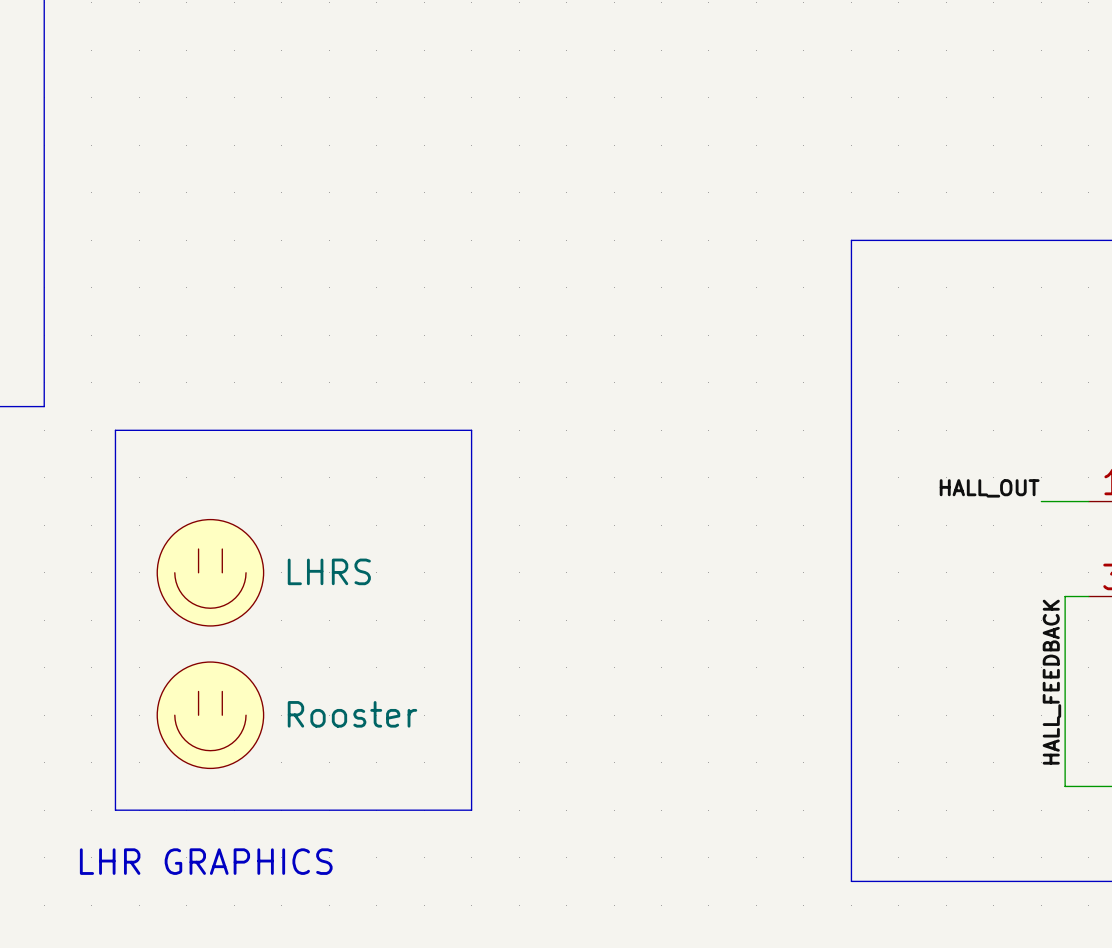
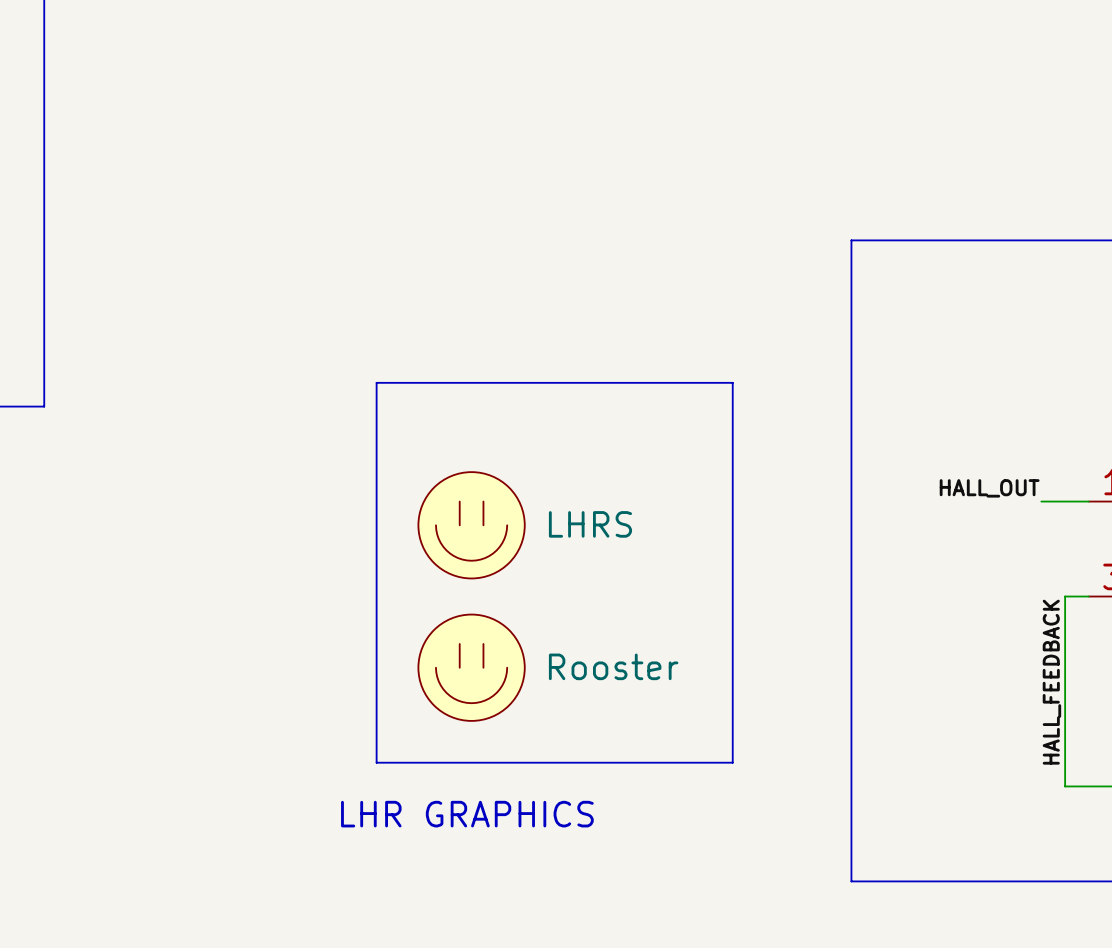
line: (115, 430) (471, 430) (471, 810) (115, 810) (115, 430) -> (376, 382) (732, 382) (732, 762) (376, 762) (376, 382)
part position: (210, 572) -> (471, 525)
part position: (210, 715) -> (471, 667)
text position: LHR GRAPHICS (206, 861) -> LHR GRAPHICS (467, 814)

